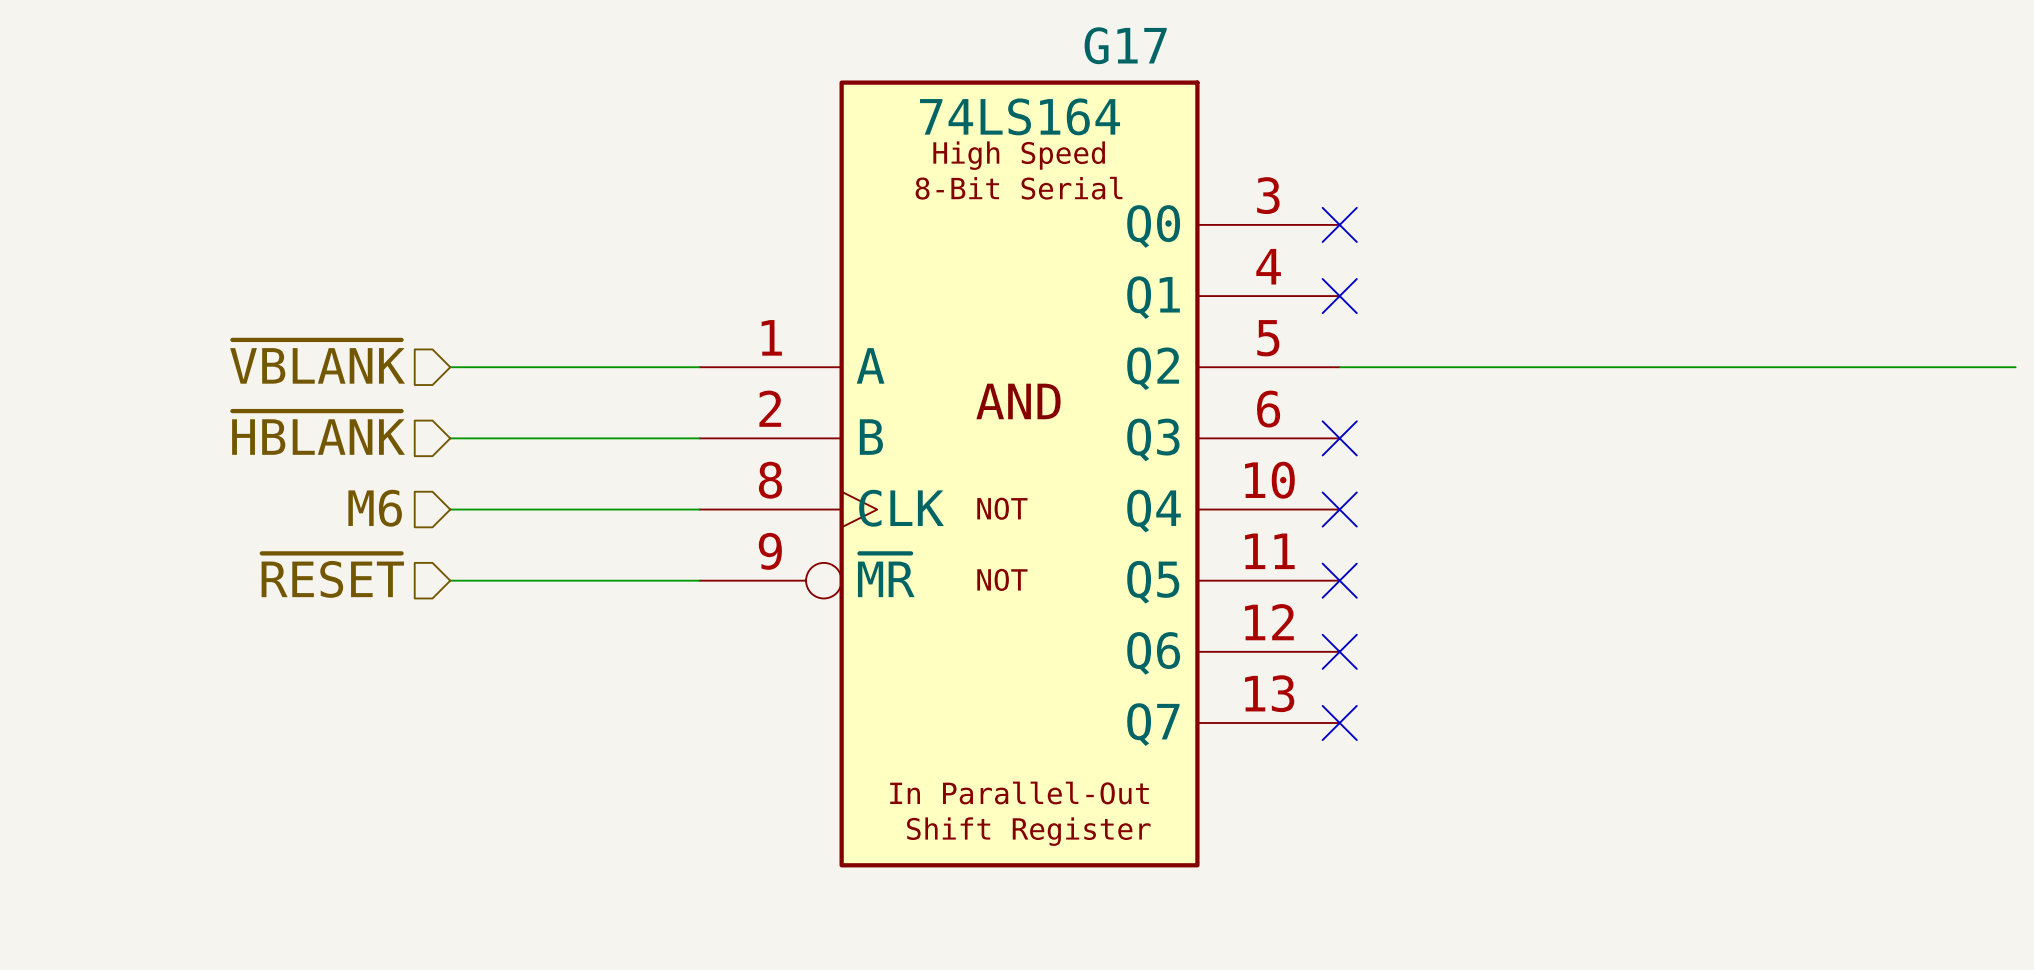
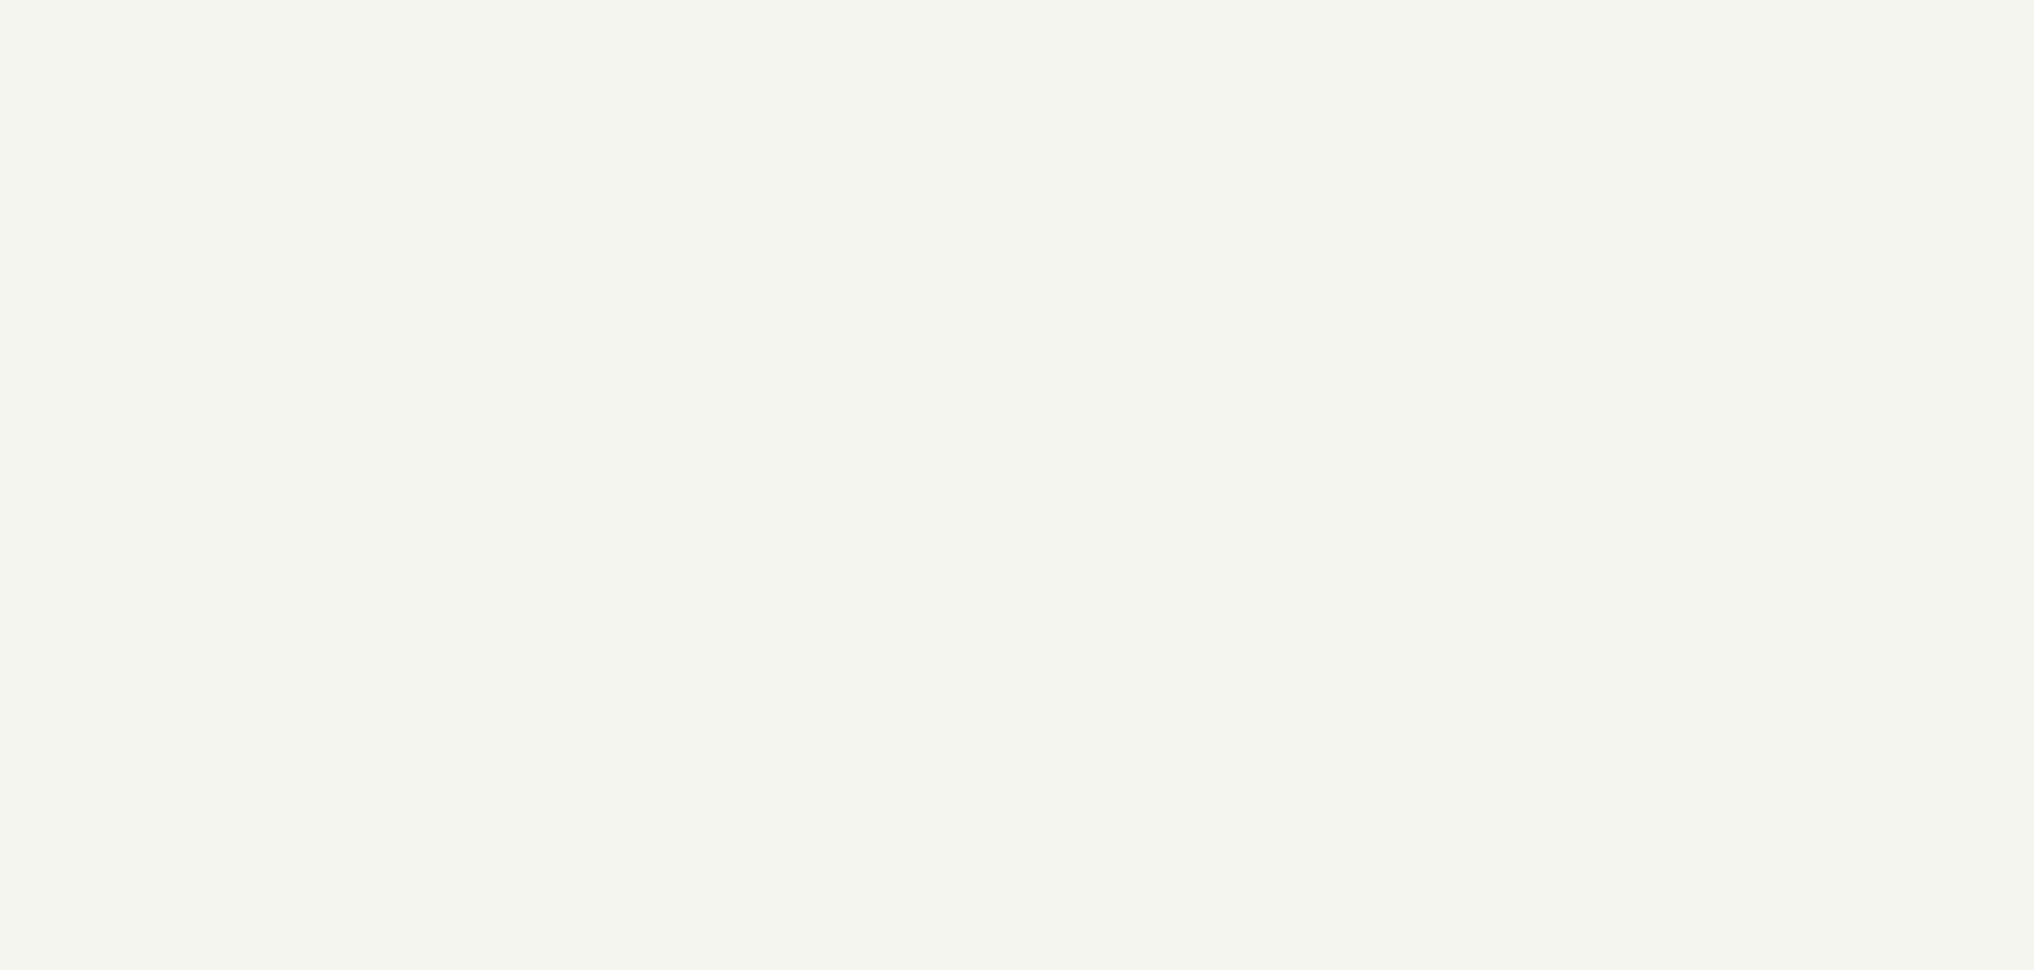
no-connect mark: (1339, 224) -> none
no-connect mark: (1339, 296) -> none
hierarchical label: ~{VBLANK} (317, 361) -> none
wire: (450, 367) (699, 367) -> none
wire: (1339, 367) (2015, 367) -> none
hierarchical label: ~{HBLANK} (318, 432) -> none
wire: (450, 438) (699, 438) -> none
no-connect mark: (1339, 438) -> none
G17: 74LS164 (1019, 473) -> none
hierarchical label: M6 (375, 508) -> none
wire: (450, 509) (699, 509) -> none
no-connect mark: (1339, 509) -> none
hierarchical label: ~{RESET} (332, 575) -> none
wire: (450, 580) (699, 580) -> none
no-connect mark: (1339, 580) -> none
no-connect mark: (1339, 651) -> none
no-connect mark: (1339, 722) -> none

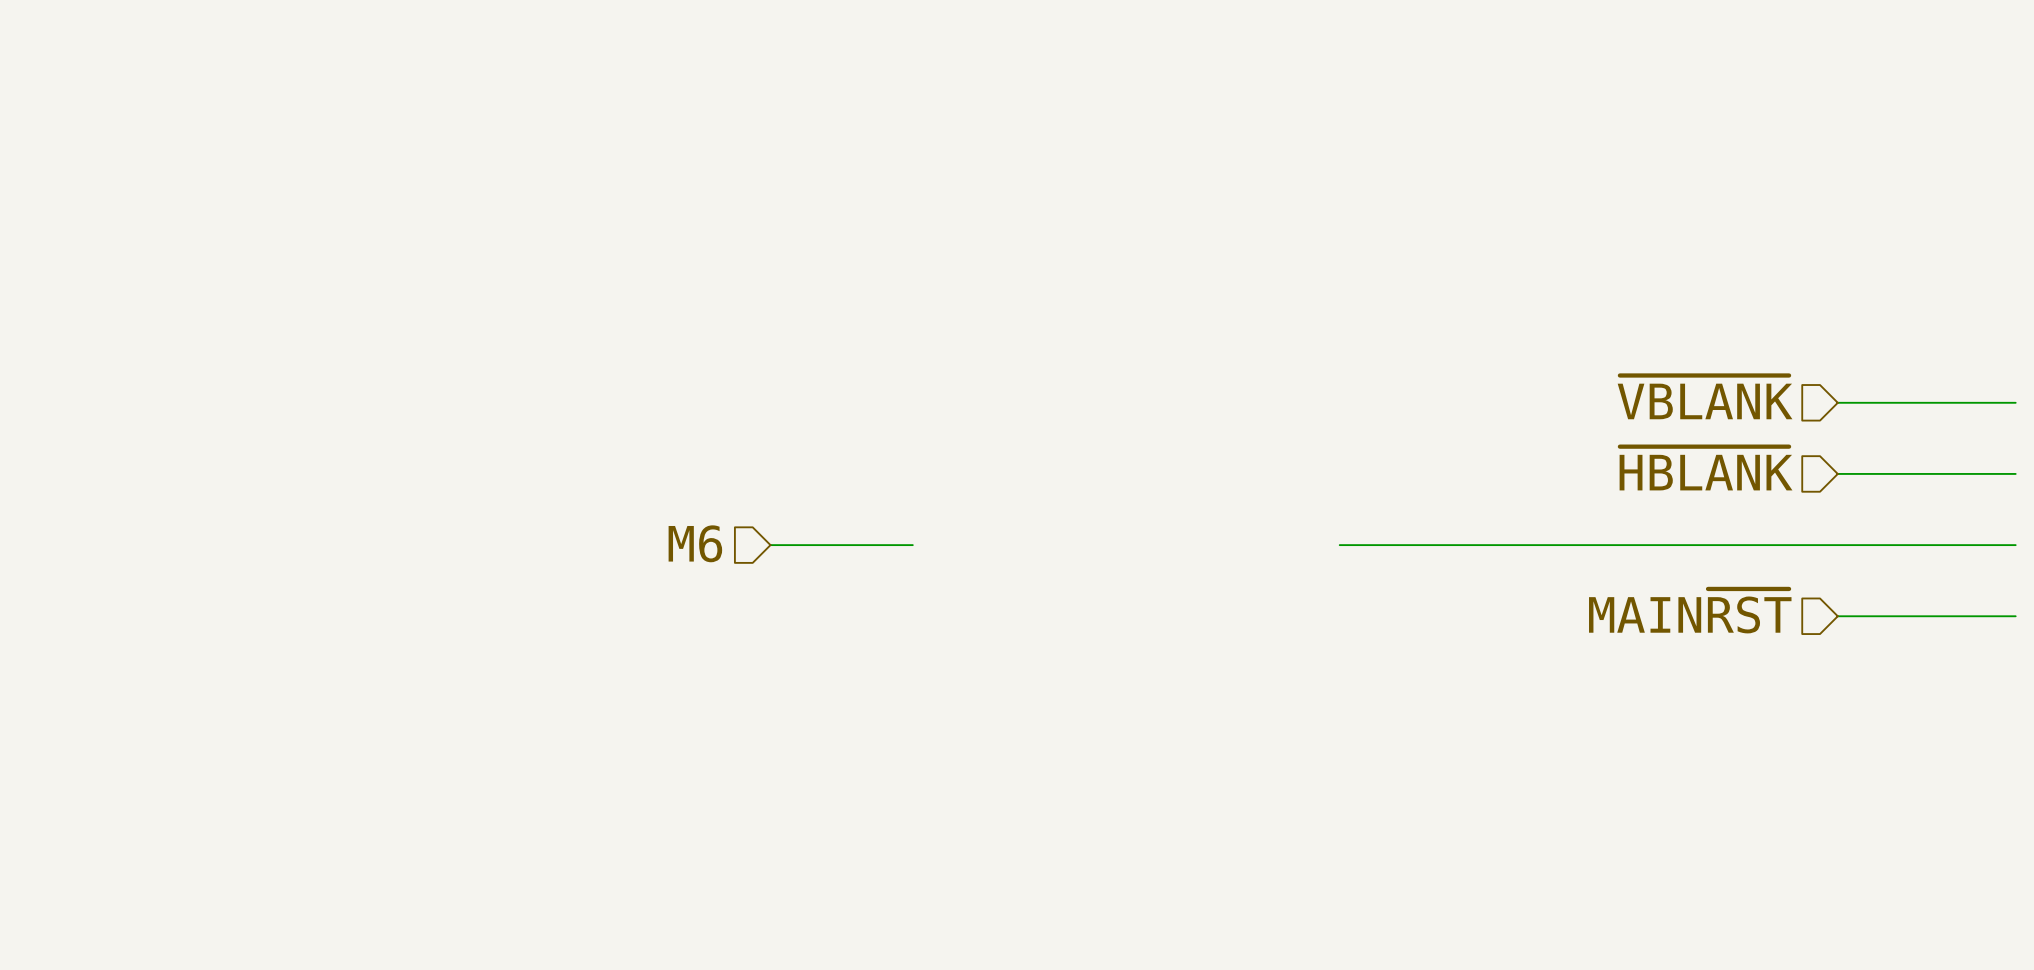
hierarchical label: none -> ~{VBLANK} (1705, 397)
wire: none -> (1837, 402) (2015, 402)
hierarchical label: none -> ~{HBLANK} (1706, 468)
wire: none -> (1837, 473) (2015, 473)
hierarchical label: none -> M6 (695, 543)
wire: none -> (770, 545) (912, 545)
wire: none -> (1339, 545) (2015, 545)
hierarchical label: none -> MAIN~{RST} (1690, 611)
wire: none -> (1837, 616) (2015, 616)

